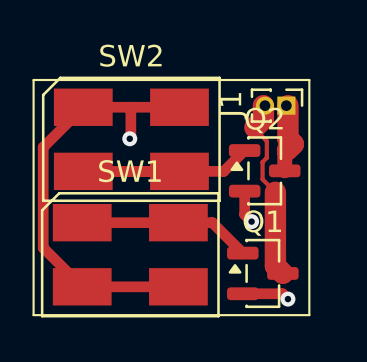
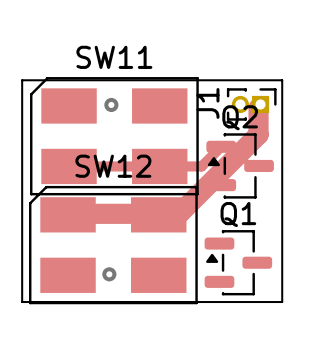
SW2 name: SW2 (130, 55) -> SW11 (114, 57)
track: (263, 105) (263, 119) (254, 129) (266, 141) (266, 157) (262, 162) (262, 179) (275, 192) (275, 265) (282, 273) -> none
track: (287, 105) (287, 138) (293, 144) (284, 152) (284, 170) -> none
track: (130, 107) (129, 138) -> none
track: (179, 107) (83, 107) (43, 147) (43, 247) (82, 286) (178, 286) -> none
track: none -> (258, 107) (258, 134) (179, 213) (65, 213)
via position: (129, 138) -> (111, 104)
SW1 name: SW1 (129, 171) -> SW12 (113, 166)
track: (244, 191) (244, 214) (251, 221) -> none
via: (251, 221) -> none
track: (82, 222) (212, 222) (242, 253) -> none
via: none -> (109, 274)
track: (242, 293) (282, 293) (287, 299) -> none
via: (287, 299) -> none

